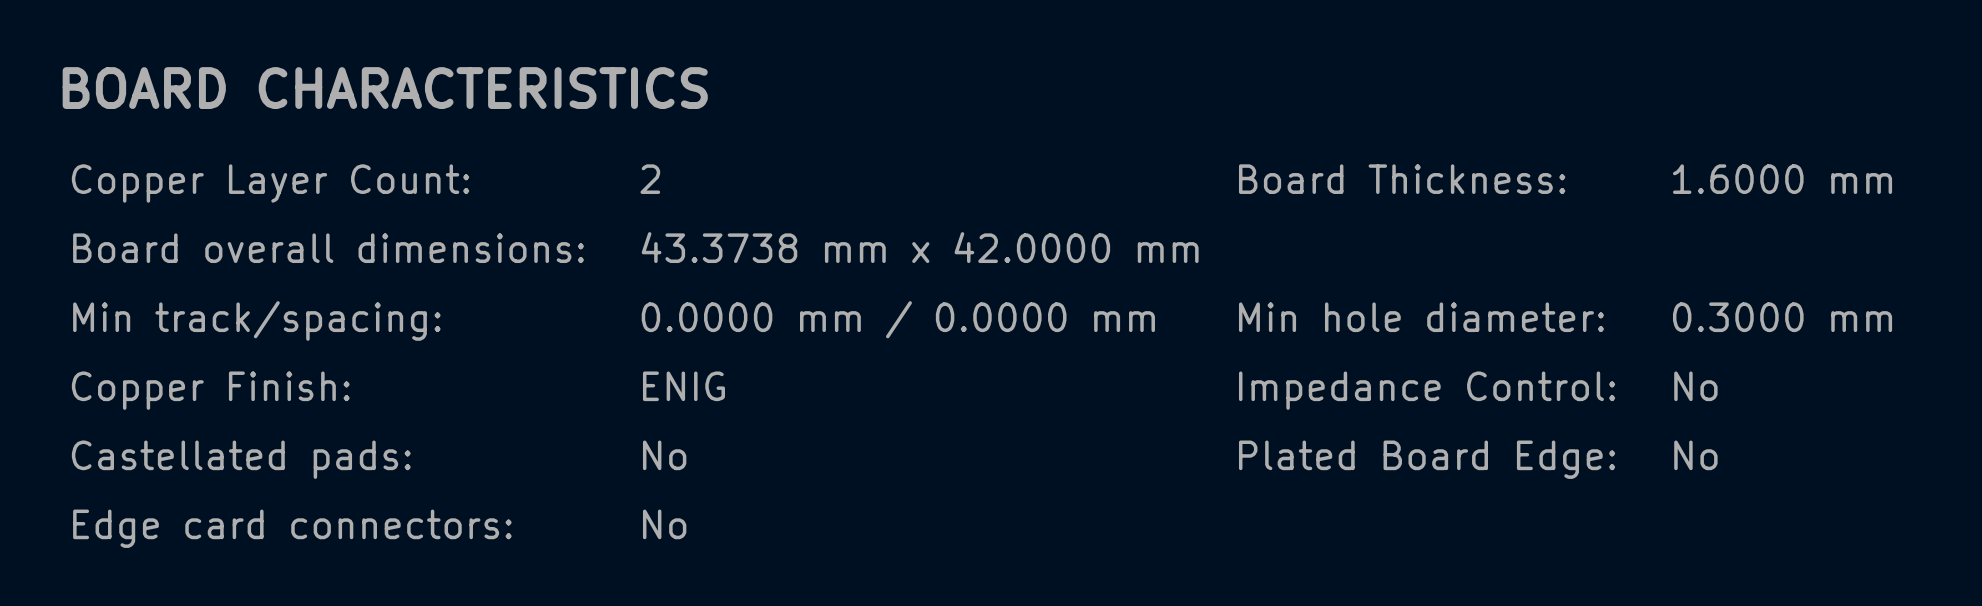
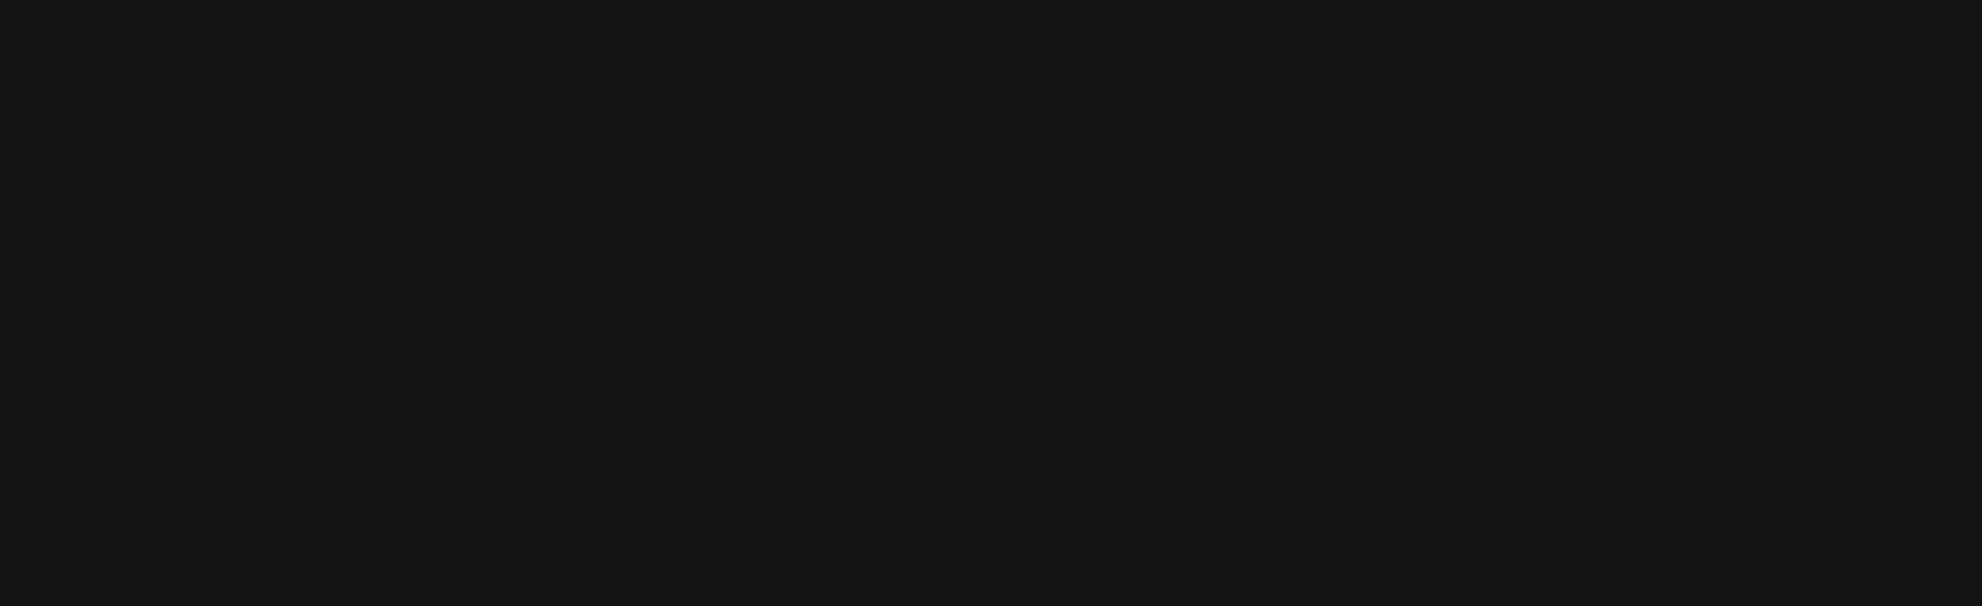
text: BOARD CHARACTERISTICS (385, 88) -> none
text: 2 (650, 179) -> none
text: Board Thickness: (1402, 179) -> none
text: 1.6000 mm (1782, 179) -> none
text: Copper Layer Count: (270, 183) -> none
text: 43.3738 mm x 42.0000 mm (920, 247) -> none
text: Board overall dimensions: (328, 248) -> none
text: Min hole diameter: (1421, 317) -> none
text: 0.3000 mm (1782, 317) -> none
text: 0.0000 mm / 0.0000 mm (898, 319) -> none
text: Min track/spacing: (256, 320) -> none
text: ENIG (683, 386) -> none
text: No (1695, 386) -> none
text: Copper Finish: (210, 390) -> none
text: Impedance Control: (1427, 390) -> none
text: No (664, 455) -> none
text: No (1695, 455) -> none
text: Castellated pads: (241, 459) -> none
text: Plated Board Edge: (1427, 459) -> none
text: No (664, 524) -> none
text: Edge card connectors: (292, 528) -> none

